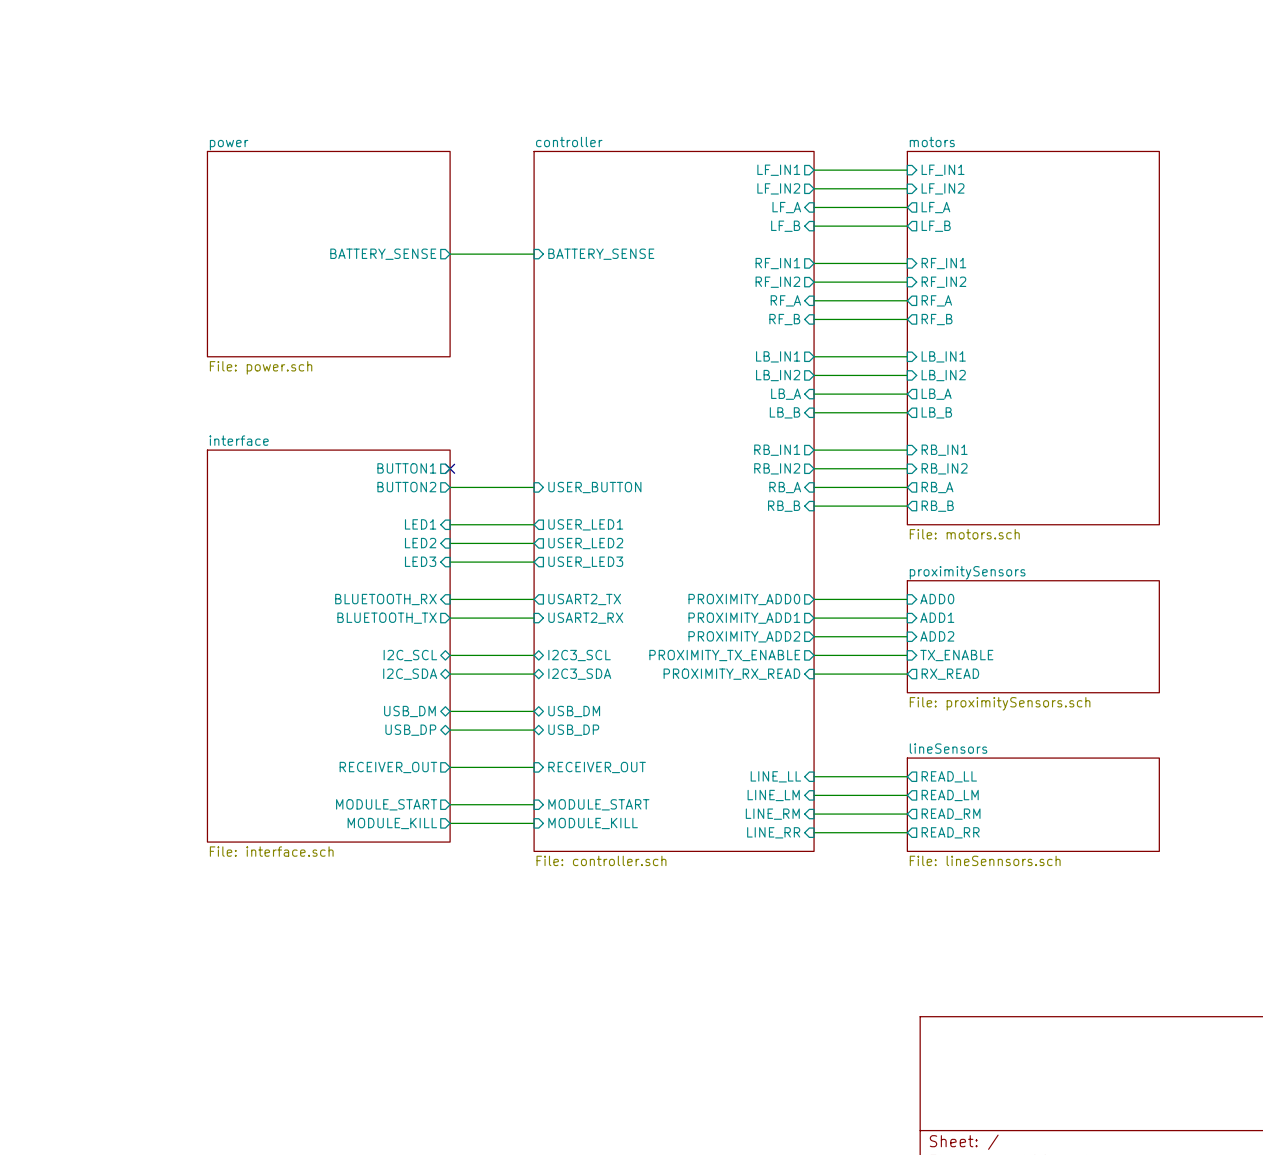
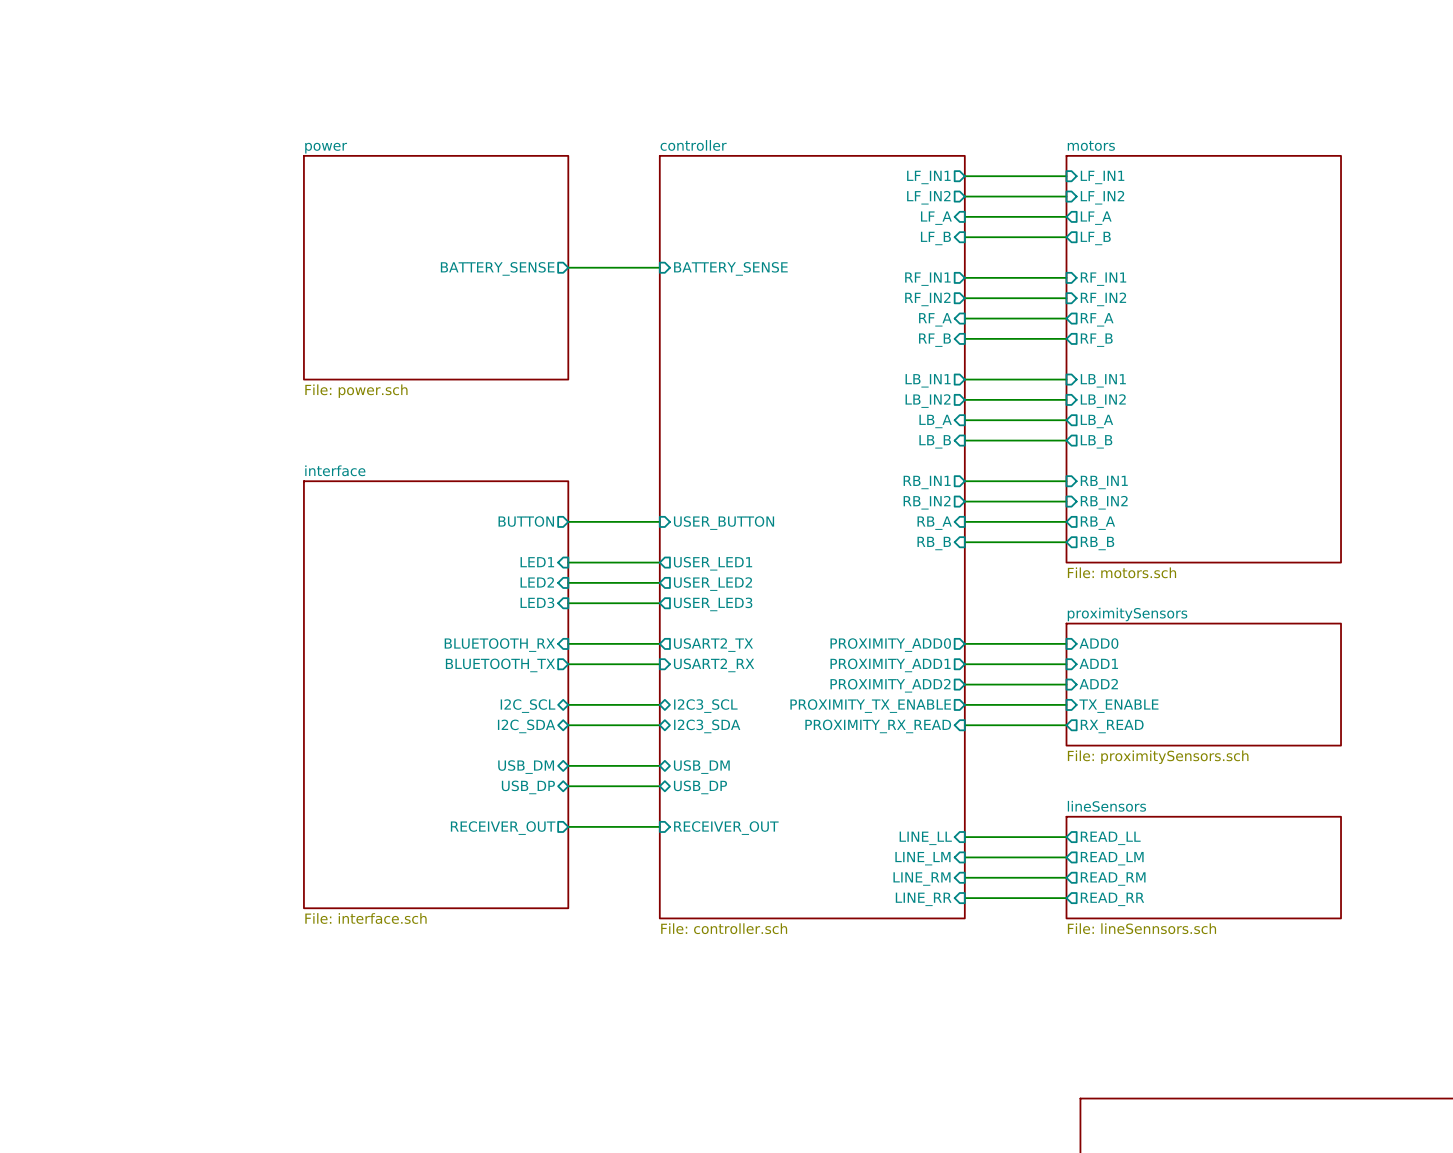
sheet pin: BUTTON1 (406, 468) -> none
no-connect mark: (450, 468) -> none
sheet pin: BUTTON2 (406, 487) -> BUTTON (526, 521)
sheet pin: MODULE_START (386, 804) -> none
wire: (450, 804) (534, 804) -> none
sheet pin: MODULE_START (598, 804) -> none
sheet pin: MODULE_KILL (392, 823) -> none
wire: (450, 823) (534, 823) -> none
sheet pin: MODULE_KILL (593, 823) -> none

